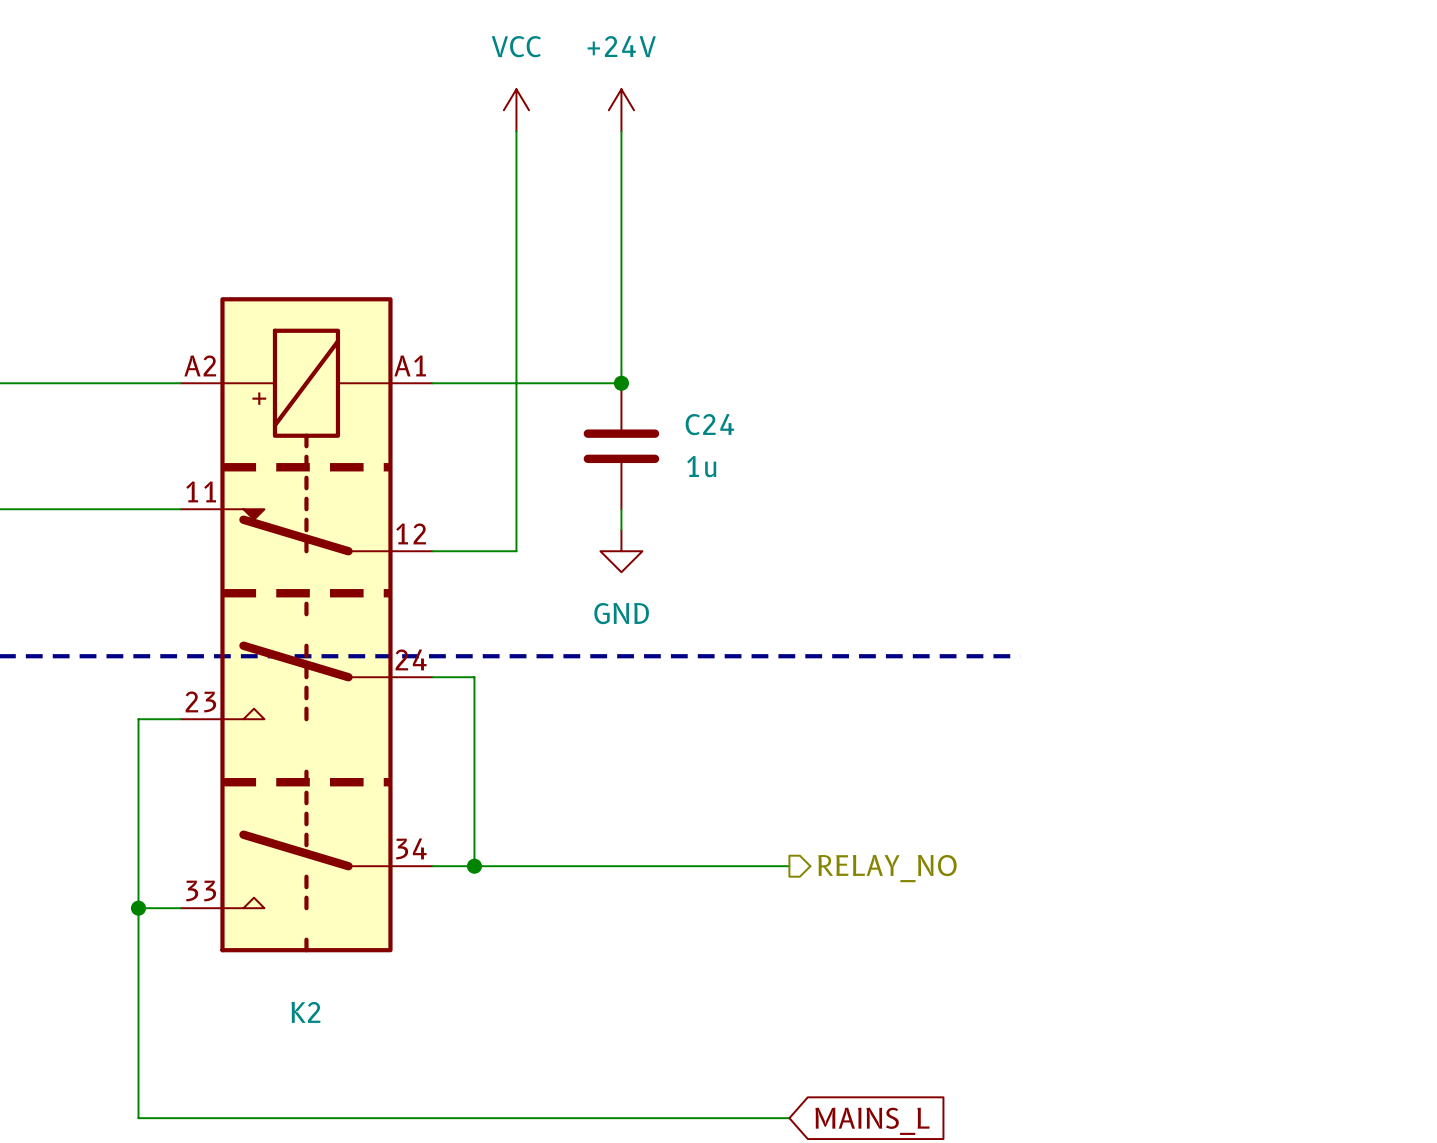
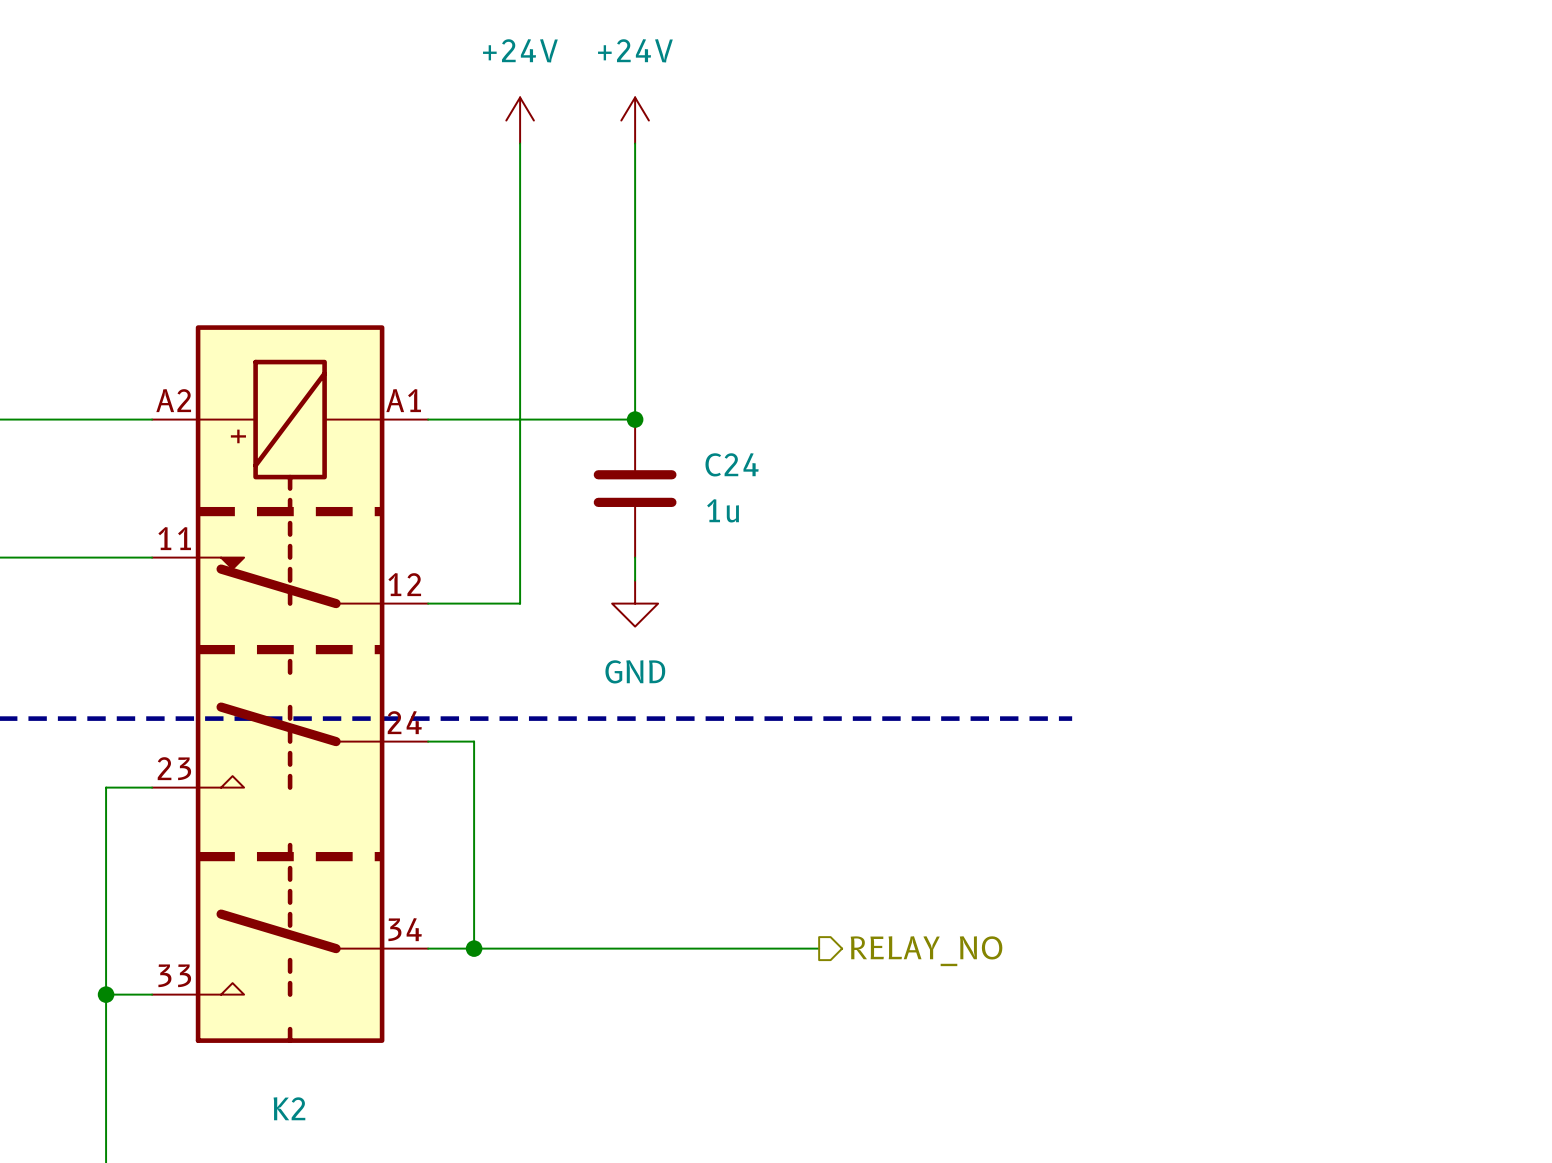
power symbol: VCC (516, 110) -> +24V (520, 120)

